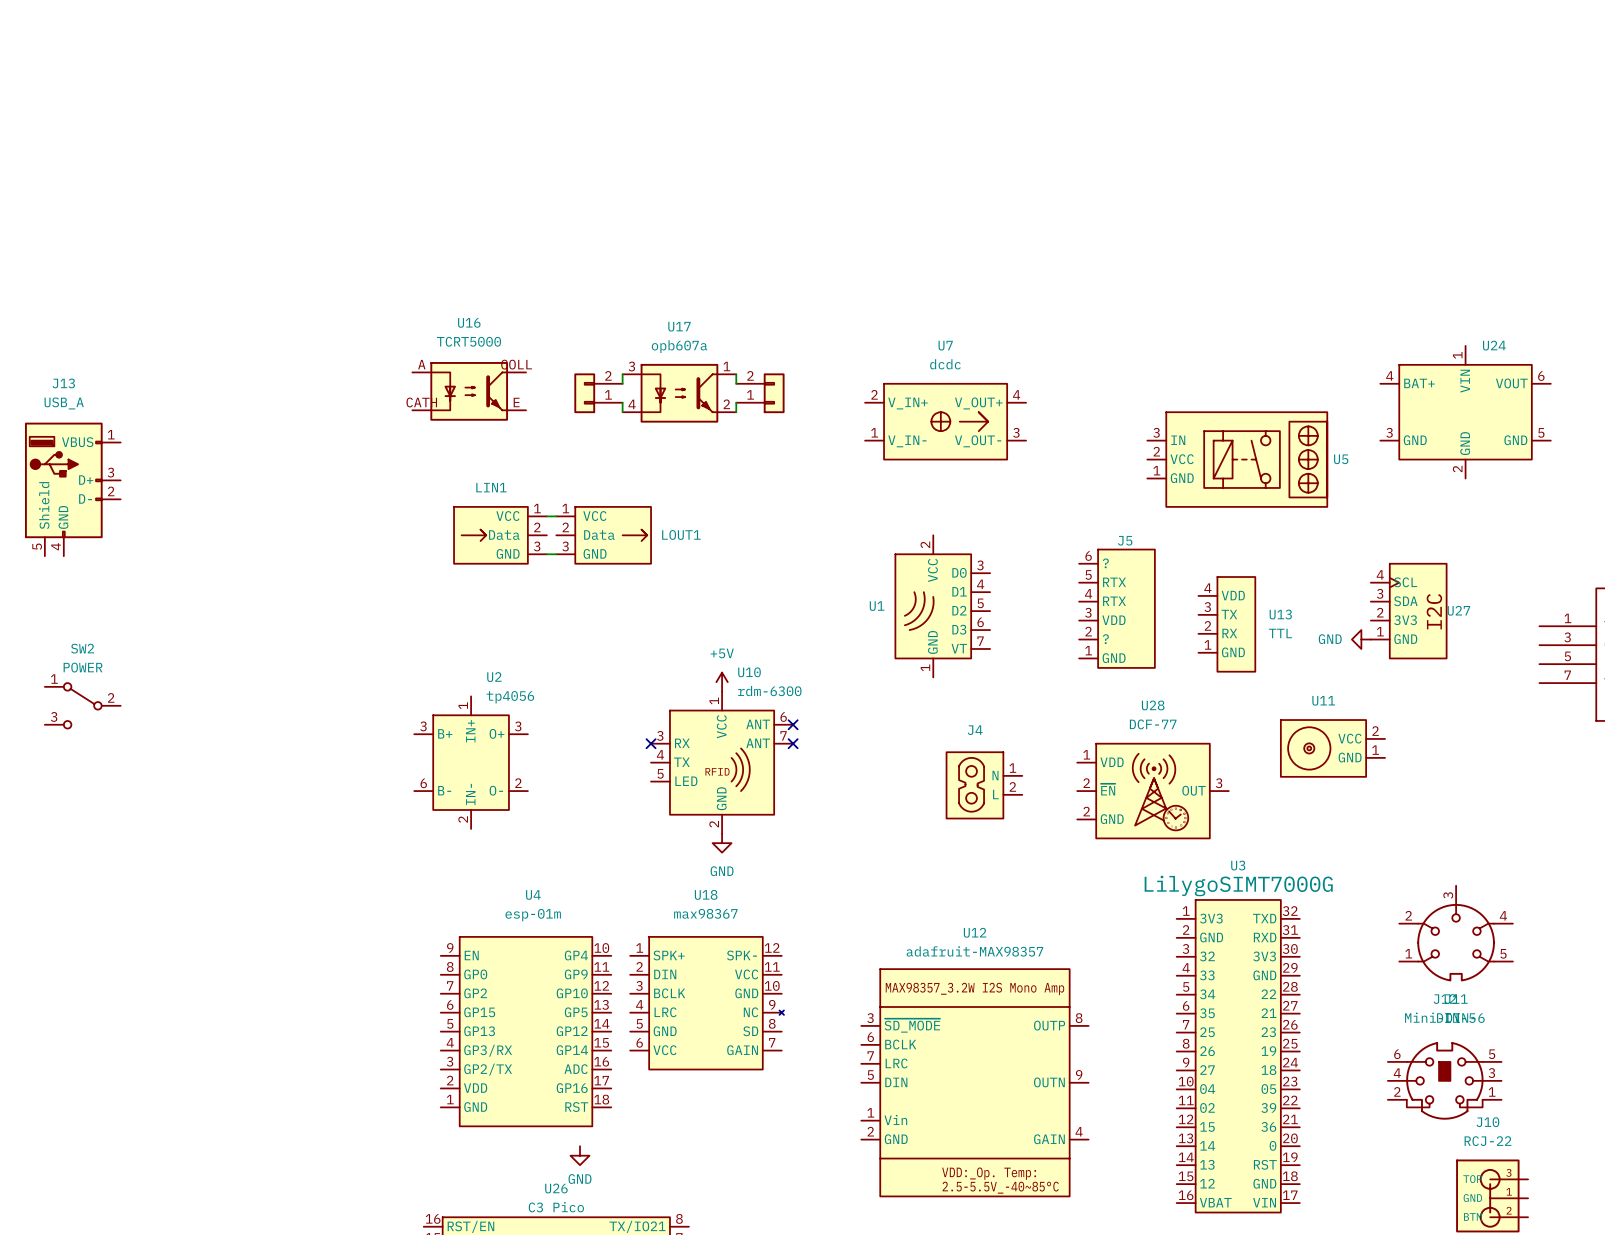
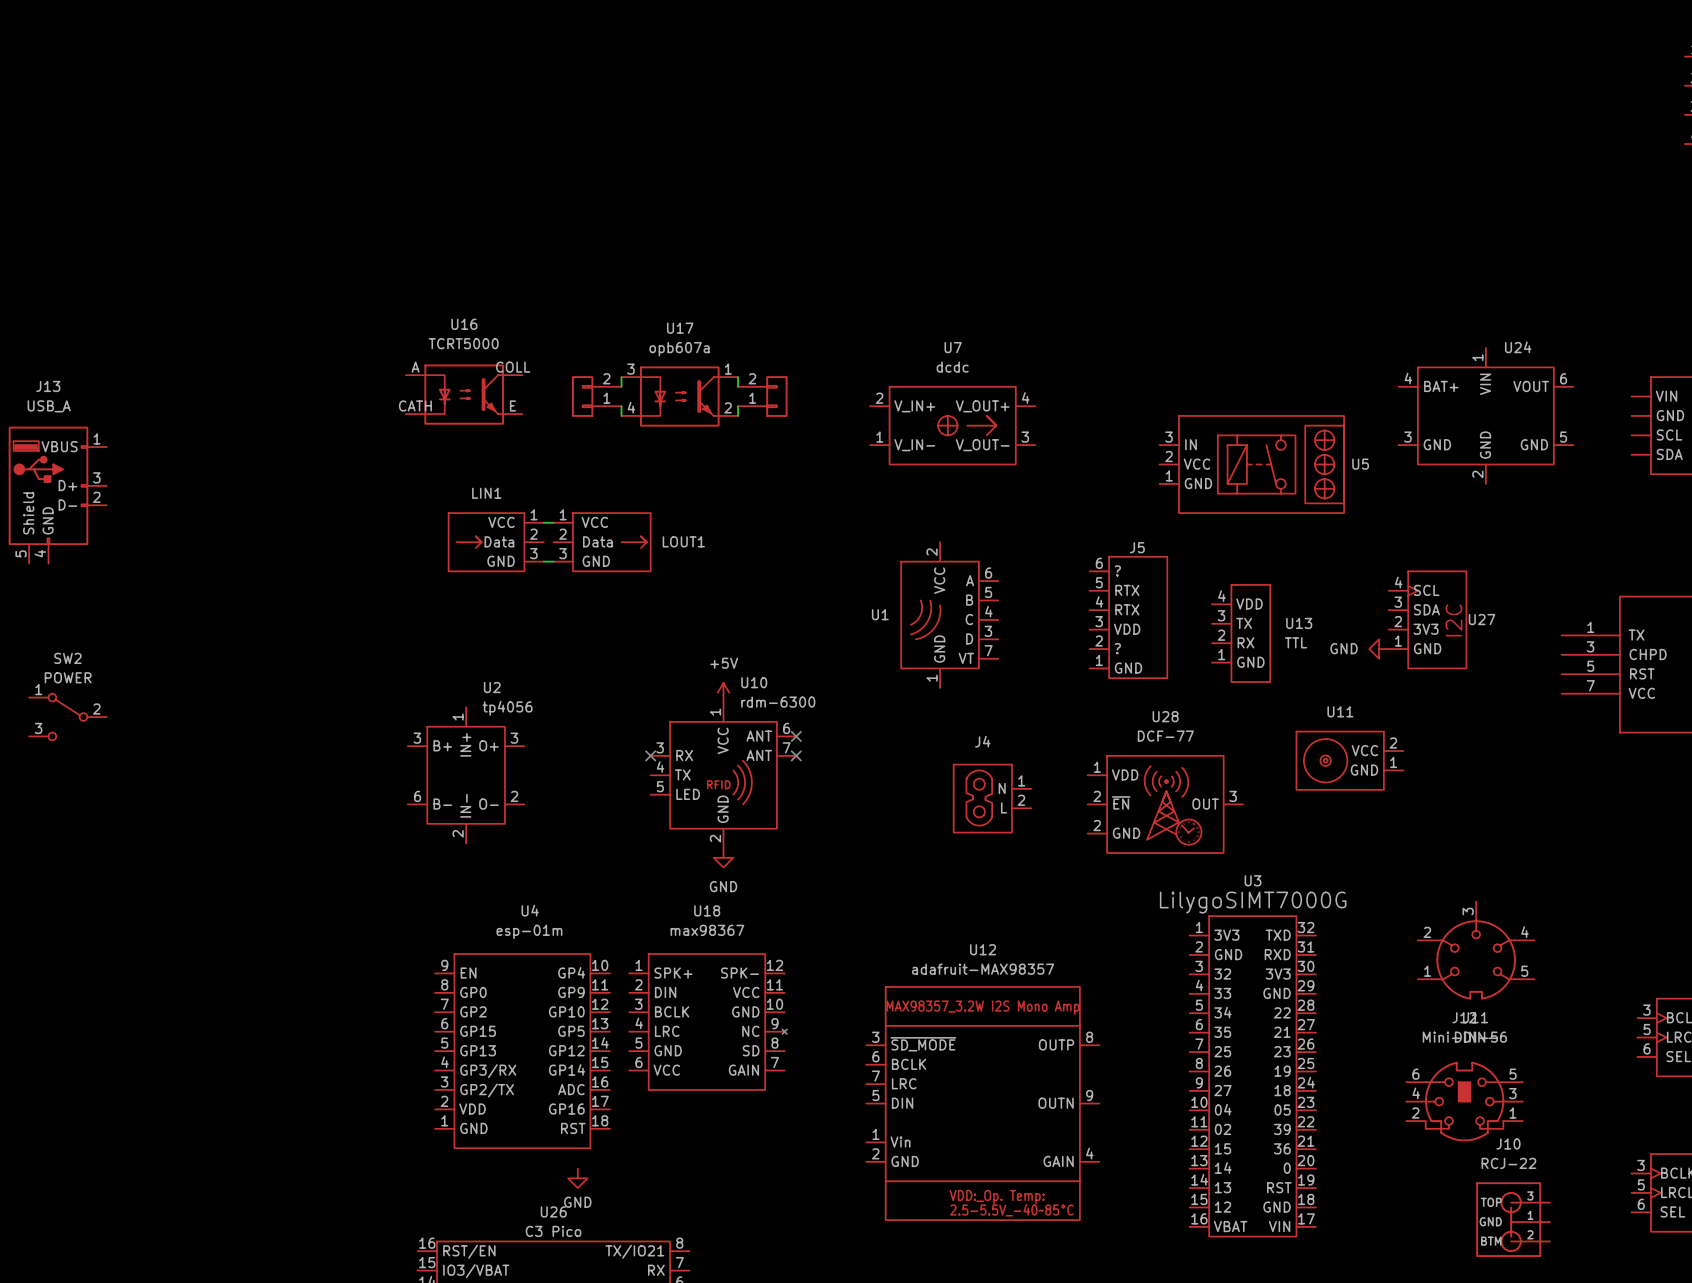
U1 pin number: 3 (980, 565) -> 6 (988, 573)
U1 pin name: D0 (959, 572) -> A (970, 580)
U1 pin number: 4 (980, 584) -> 5 (988, 592)
U1 pin name: D1 (959, 591) -> B (969, 600)
U1 pin number: 5 (980, 603) -> 4 (988, 611)
U1 pin name: D2 (959, 610) -> C (969, 619)
U1 pin number: 6 (980, 622) -> 3 (988, 631)
U1 pin name: D3 (959, 629) -> D (969, 638)

